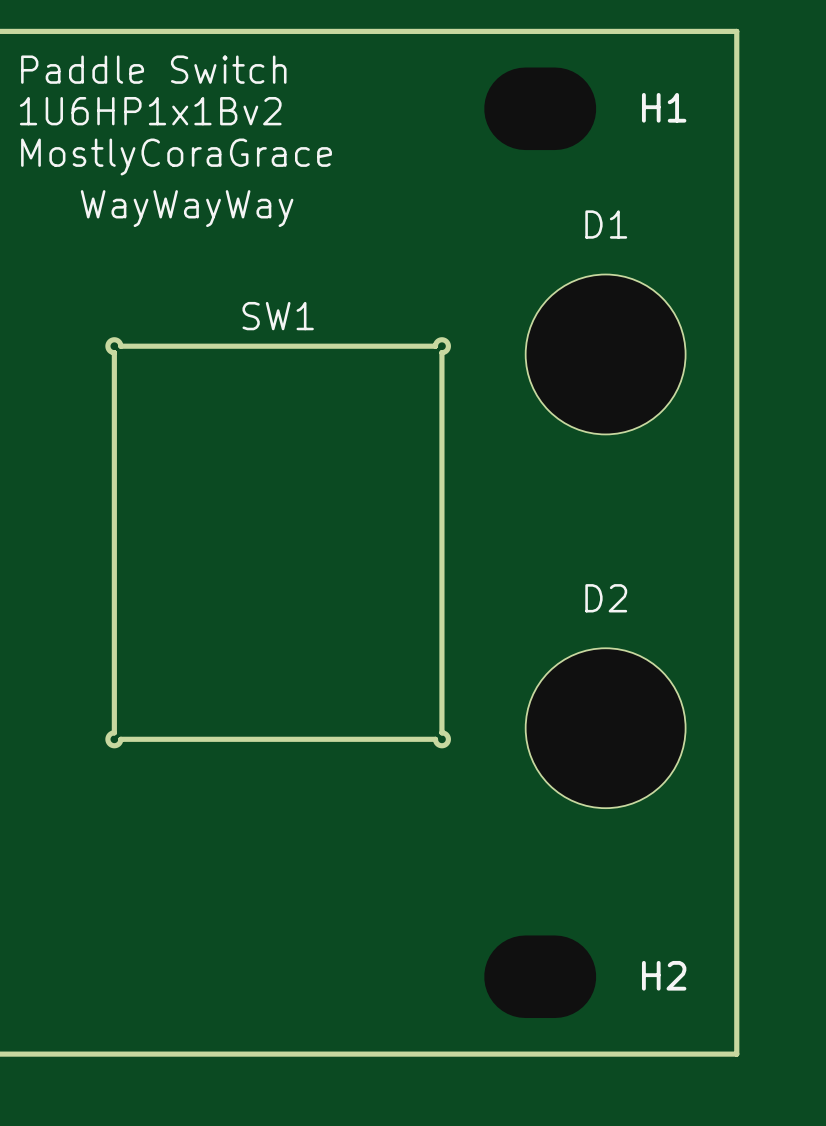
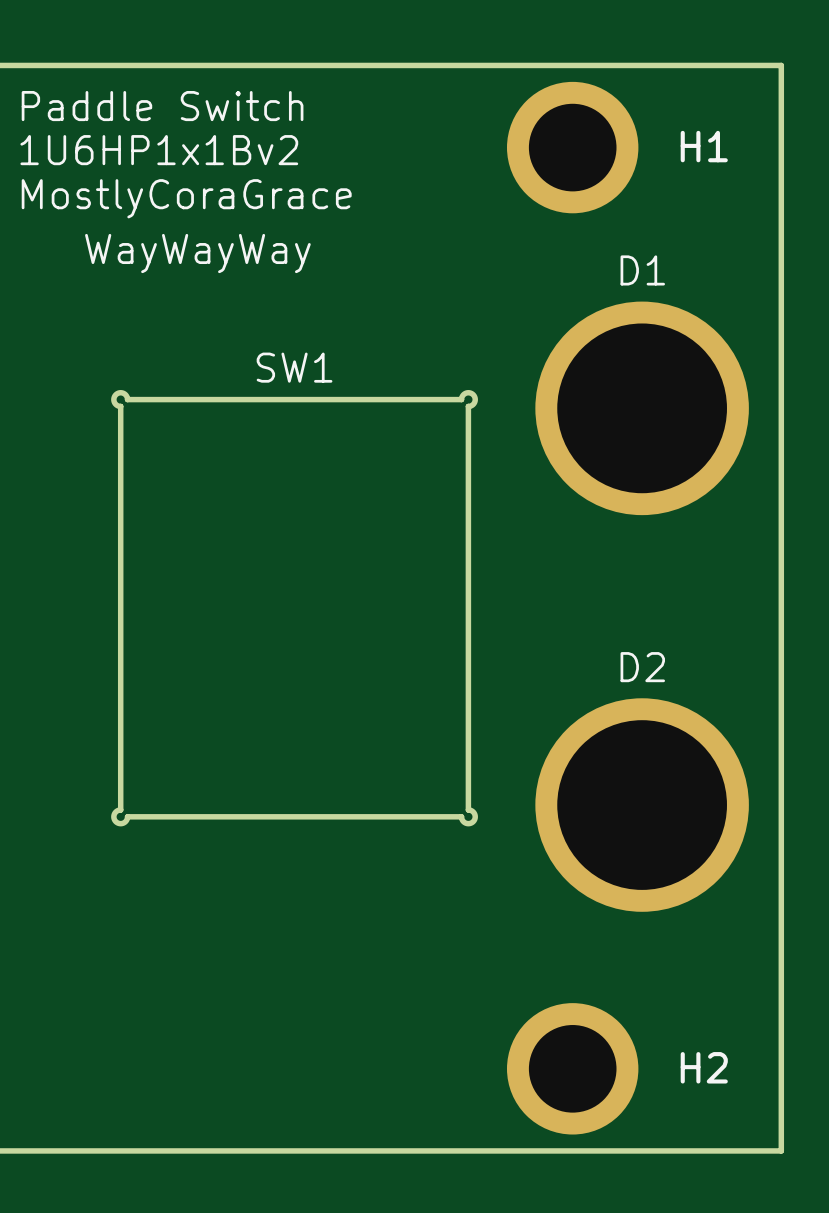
H1 footprint: [484, 67, 597, 151] -> [506, 81, 639, 214]
D1 footprint: [525, 274, 686, 435] -> [535, 301, 749, 516]
D2 footprint: [525, 648, 686, 809] -> [535, 698, 749, 912]
H2 footprint: [484, 935, 597, 1019] -> [506, 1003, 639, 1135]

